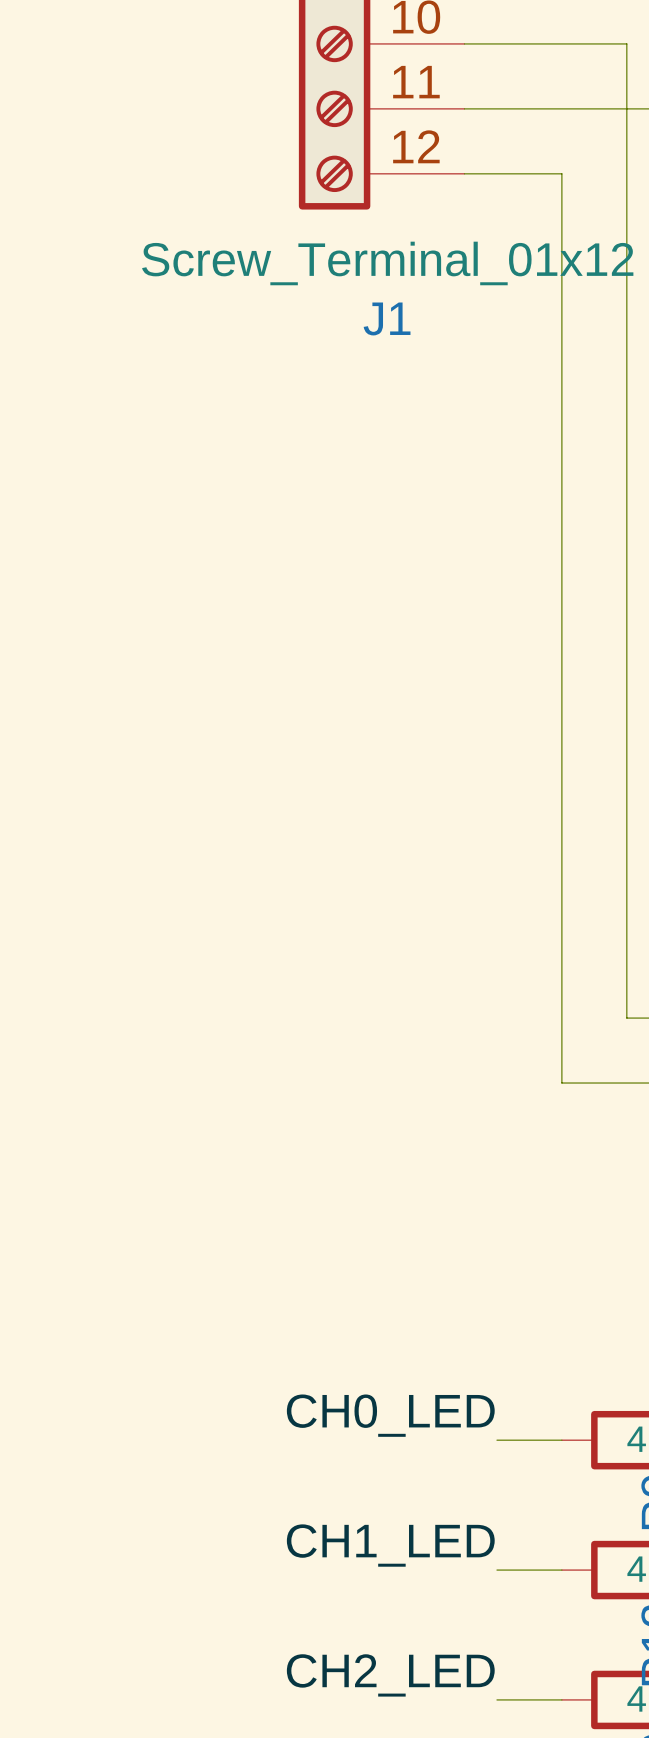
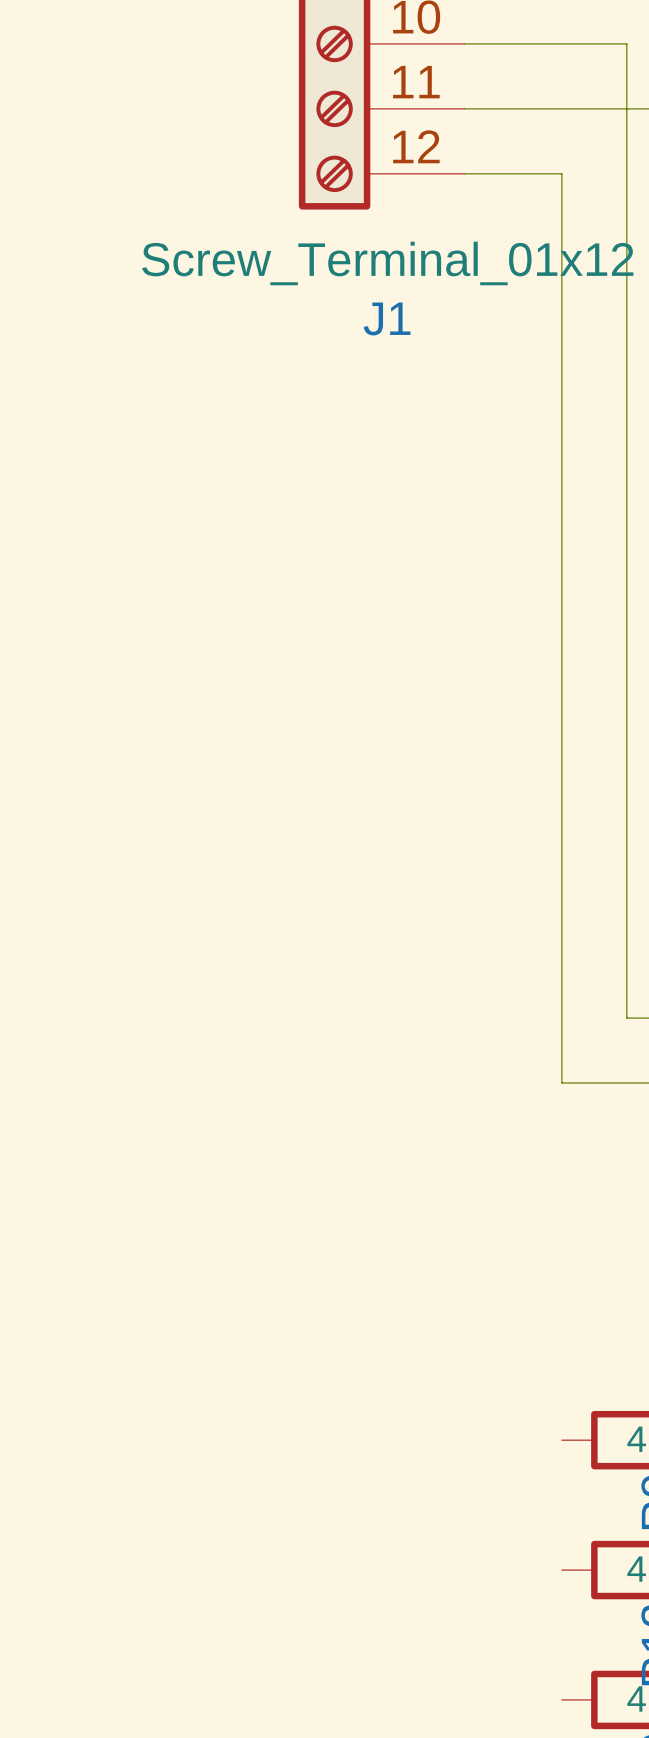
label: CH0_LED (390, 1415) -> none
wire: (496, 1440) (561, 1440) -> none
label: CH1_LED (390, 1545) -> none
wire: (496, 1570) (561, 1570) -> none
label: CH2_LED (390, 1675) -> none
wire: (496, 1699) (561, 1699) -> none

